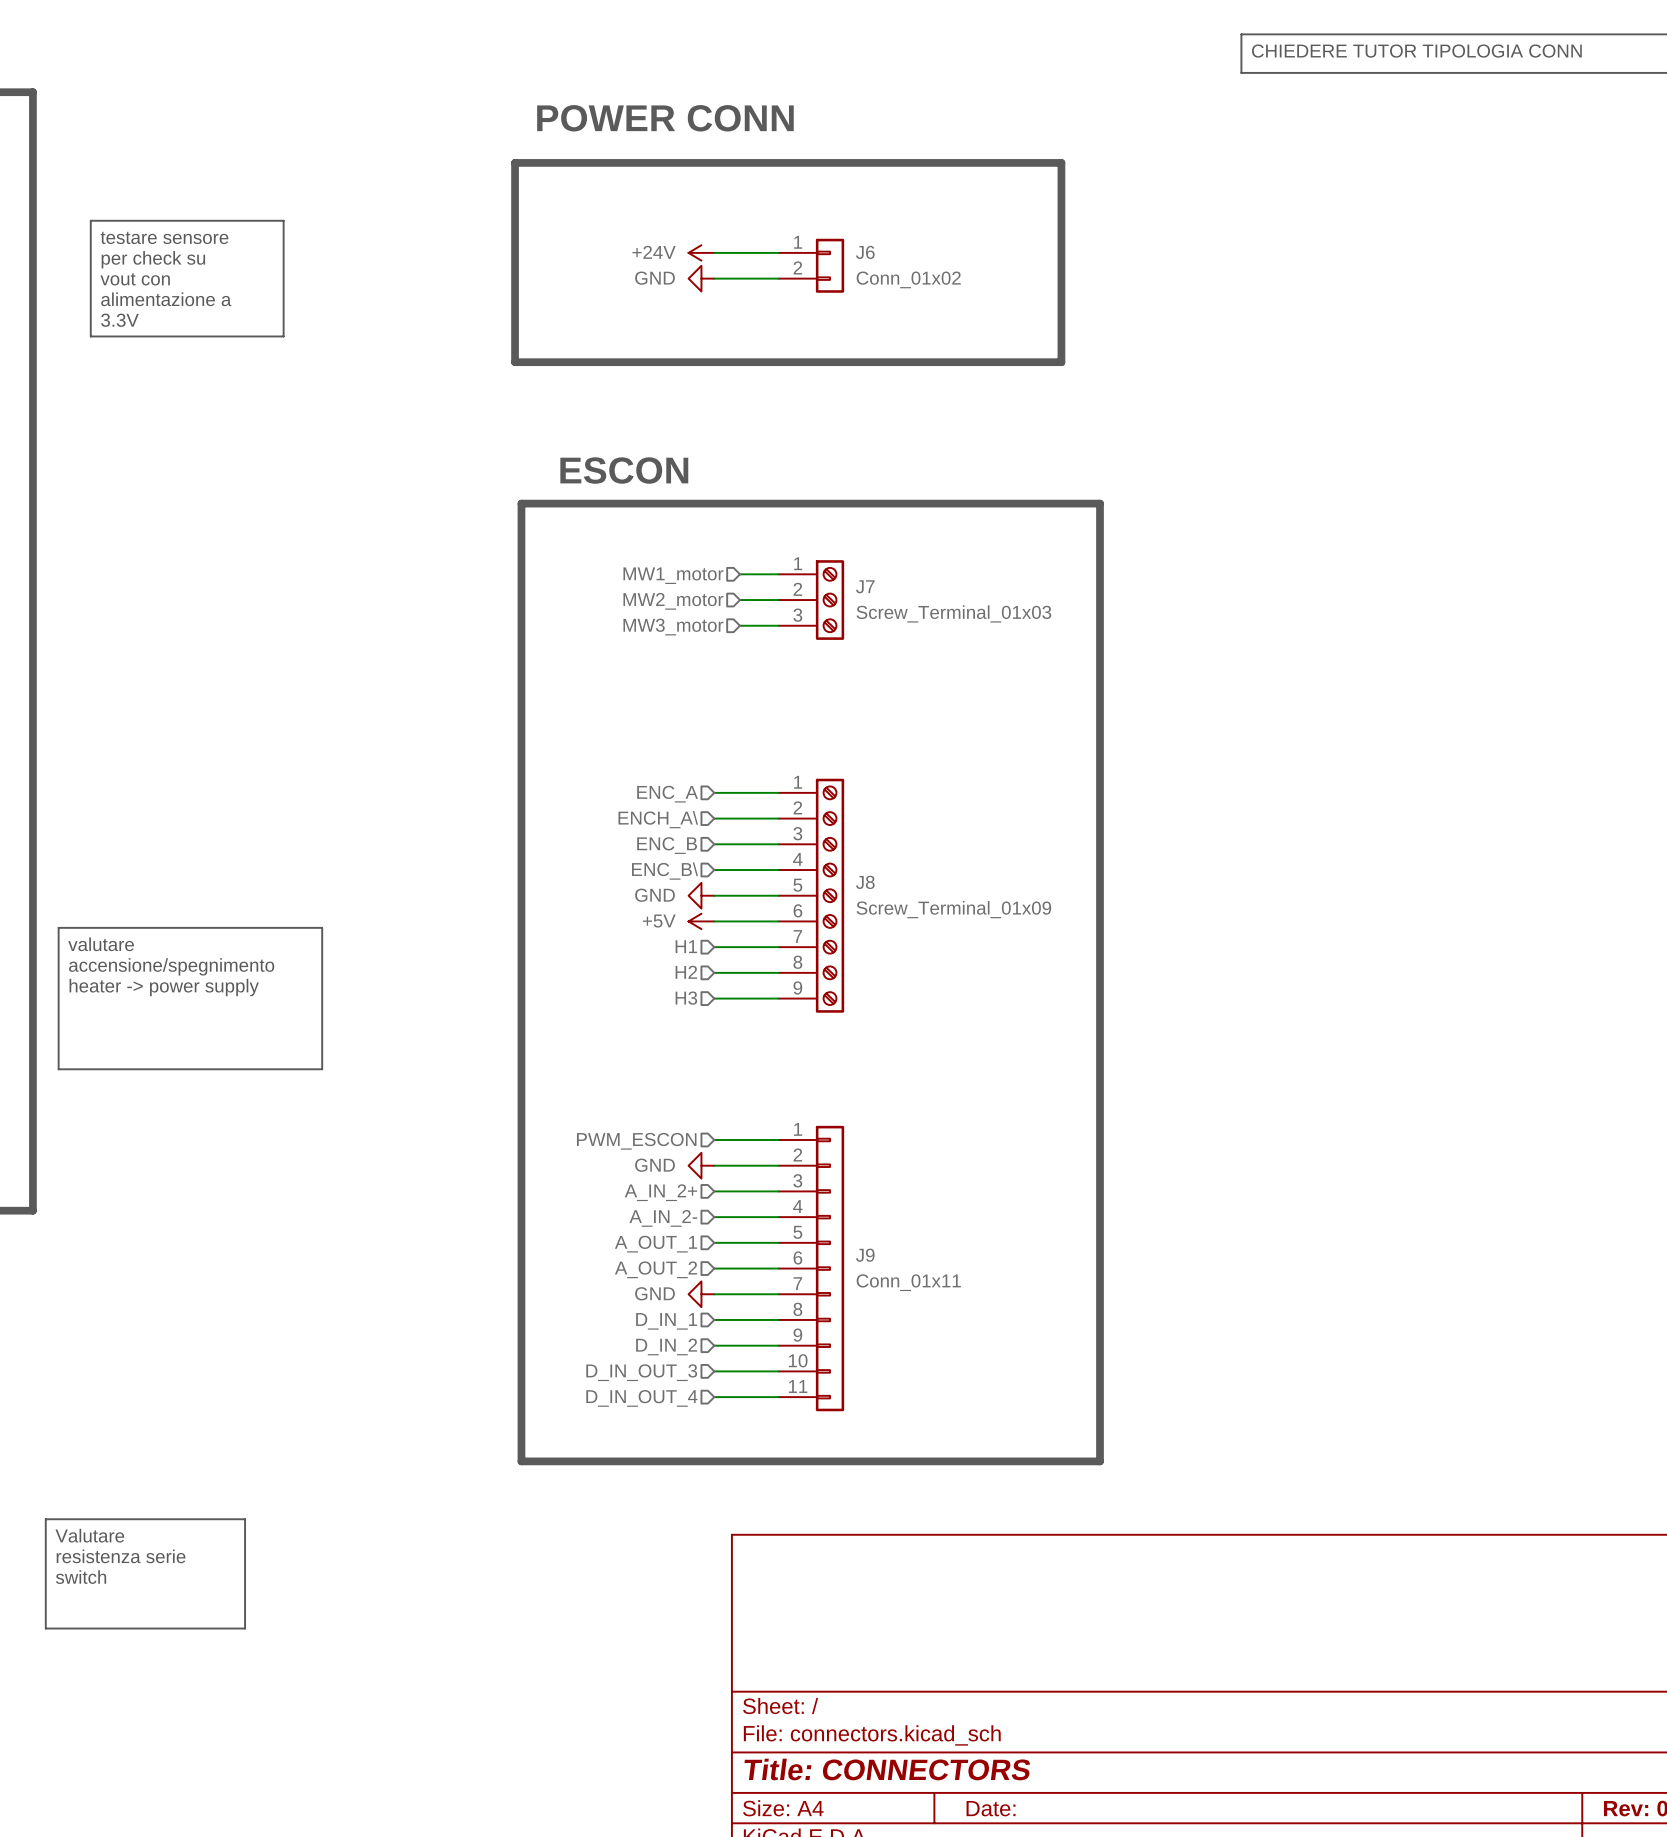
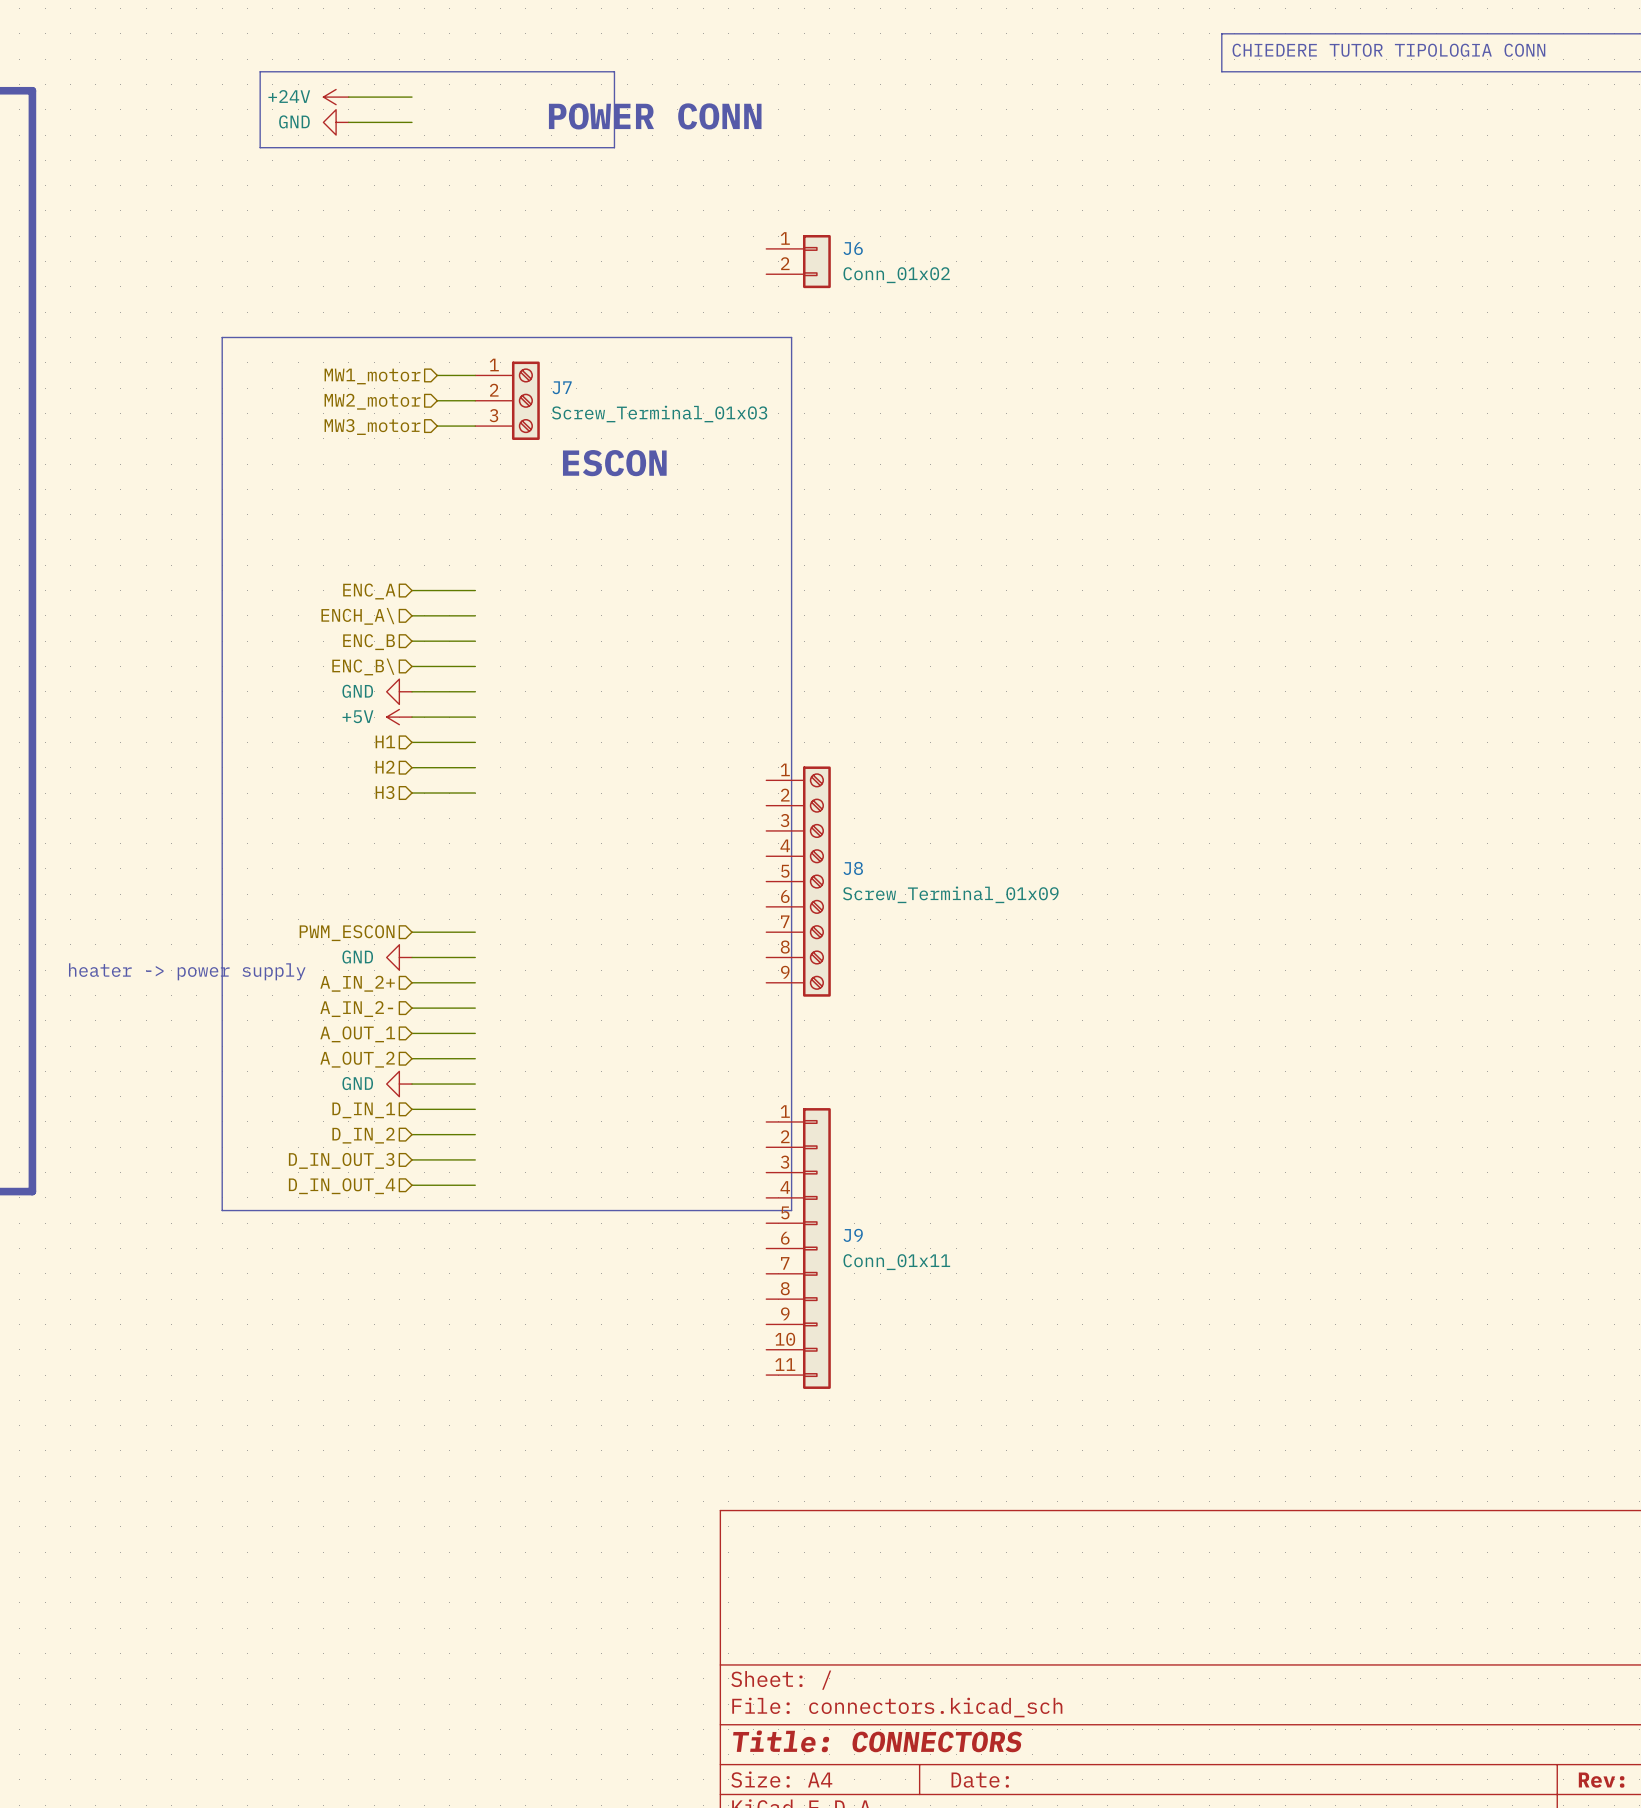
line: none -> (260, 71) (614, 71) (614, 147) (260, 147) (260, 71)
power symbol: none -> +24V (336, 97)
wire: none -> (348, 97) (412, 97)
power symbol: none -> GND (336, 122)
wire: none -> (348, 122) (412, 122)
line: (515, 162) (1061, 162) (1061, 362) (515, 362) (515, 162) -> none
line: (90, 220) (283, 220) (283, 336) (90, 336) (90, 220) -> none
text: testare sensore (164, 237) -> none
power symbol: +24V (701, 252) -> none
wire: (714, 252) (778, 252) -> none
text: per check su (153, 259) -> none
power symbol: GND (701, 278) -> none
wire: (714, 278) (778, 278) -> none
text: vout con (135, 279) -> none
text: alimentazione a (166, 299) -> none
text: 3.3V (119, 320) -> none
line: none -> (222, 337) (791, 337) (791, 1210) (222, 1210) (222, 337)
wire: none -> (437, 375) (475, 375)
hierarchical label: none -> MW1_motor (372, 376)
wire: none -> (437, 400) (475, 400)
hierarchical label: none -> MW2_motor (372, 401)
wire: none -> (437, 426) (475, 426)
hierarchical label: none -> MW3_motor (372, 427)
line: (521, 503) (1099, 503) (1099, 1461) (521, 1461) (521, 503) -> none
wire: (740, 574) (778, 574) -> none
hierarchical label: MW1_motor (673, 575) -> none
wire: none -> (412, 590) (475, 590)
wire: (740, 600) (778, 600) -> none
J7 position: (811, 600) -> (507, 400)
hierarchical label: none -> ENC_A (369, 591)
hierarchical label: MW2_motor (673, 601) -> none
wire: none -> (412, 615) (475, 615)
wire: (740, 625) (778, 625) -> none
hierarchical label: none -> ENCH_A\ (357, 616)
hierarchical label: MW3_motor (673, 627) -> none
wire: none -> (412, 641) (475, 641)
hierarchical label: none -> ENC_B (369, 642)
wire: none -> (412, 666) (475, 666)
hierarchical label: none -> ENC_B\ (363, 666)
power symbol: none -> GND (399, 691)
wire: none -> (412, 691) (475, 691)
power symbol: none -> +5V (399, 717)
wire: none -> (412, 717) (475, 717)
hierarchical label: none -> H1 (385, 741)
wire: none -> (412, 742) (475, 742)
hierarchical label: none -> H2 (385, 767)
wire: none -> (412, 767) (475, 767)
wire: (714, 792) (778, 792) -> none
hierarchical label: ENC_A (667, 794) -> none
hierarchical label: none -> H3 (385, 792)
wire: none -> (412, 793) (475, 793)
wire: (714, 818) (778, 818) -> none
hierarchical label: ENCH_A\ (658, 819) -> none
wire: (714, 844) (778, 844) -> none
hierarchical label: ENC_B (667, 845) -> none
wire: (714, 870) (778, 870) -> none
hierarchical label: ENC_B\ (664, 871) -> none
power symbol: GND (701, 895) -> none
wire: (714, 895) (778, 895) -> none
power symbol: +5V (701, 921) -> none
wire: (714, 921) (778, 921) -> none
line: (58, 927) (322, 927) (322, 1069) (58, 1069) (58, 927) -> none
text: valutare (101, 944) -> none
hierarchical label: H1 (686, 946) -> none
wire: none -> (412, 932) (475, 932)
wire: (714, 947) (778, 947) -> none
hierarchical label: none -> PWM_ESCON (347, 933)
text: accensione/spegnimento (171, 966) -> none
power symbol: none -> GND (399, 957)
wire: none -> (412, 957) (475, 957)
hierarchical label: H2 (686, 972) -> none
wire: (714, 972) (778, 972) -> none
wire: none -> (412, 982) (475, 982)
hierarchical label: H3 (686, 998) -> none
wire: (714, 998) (778, 998) -> none
hierarchical label: none -> A_IN_2+ (357, 983)
wire: none -> (412, 1008) (475, 1008)
hierarchical label: none -> A_IN_2- (356, 1009)
wire: none -> (412, 1033) (475, 1033)
hierarchical label: none -> A_OUT_1 (357, 1034)
wire: none -> (412, 1058) (475, 1058)
hierarchical label: none -> A_OUT_2 (357, 1059)
power symbol: none -> GND (399, 1084)
wire: none -> (412, 1084) (475, 1084)
wire: none -> (412, 1109) (475, 1109)
hierarchical label: none -> D_IN_1 (363, 1110)
wire: (714, 1139) (778, 1139) -> none
hierarchical label: PWM_ESCON (636, 1141) -> none
wire: none -> (412, 1134) (475, 1134)
hierarchical label: none -> D_IN_2 (363, 1135)
power symbol: GND (701, 1165) -> none
wire: (714, 1165) (778, 1165) -> none
wire: none -> (412, 1159) (475, 1159)
hierarchical label: none -> D_IN_OUT_3 (341, 1160)
wire: (714, 1191) (778, 1191) -> none
hierarchical label: A_IN_2+ (660, 1192) -> none
wire: none -> (412, 1185) (475, 1185)
hierarchical label: none -> D_IN_OUT_4 (342, 1186)
wire: (714, 1217) (778, 1217) -> none
hierarchical label: A_IN_2- (663, 1218) -> none
wire: (714, 1242) (778, 1242) -> none
hierarchical label: A_OUT_1 (656, 1244) -> none
wire: (714, 1268) (778, 1268) -> none
hierarchical label: A_OUT_2 (655, 1269) -> none
power symbol: GND (701, 1294) -> none
wire: (714, 1294) (778, 1294) -> none
wire: (714, 1319) (778, 1319) -> none
hierarchical label: D_IN_1 (666, 1321) -> none
wire: (714, 1345) (778, 1345) -> none
hierarchical label: D_IN_2 (666, 1346) -> none
wire: (714, 1371) (778, 1371) -> none
hierarchical label: D_IN_OUT_3 (641, 1372) -> none
wire: (714, 1397) (778, 1397) -> none
hierarchical label: D_IN_OUT_4 (641, 1398) -> none
line: (45, 1519) (245, 1519) (245, 1628) (45, 1628) (45, 1519) -> none
text: Valutare (89, 1535) -> none
text: resistenza serie (121, 1556) -> none
text: switch (81, 1577) -> none

